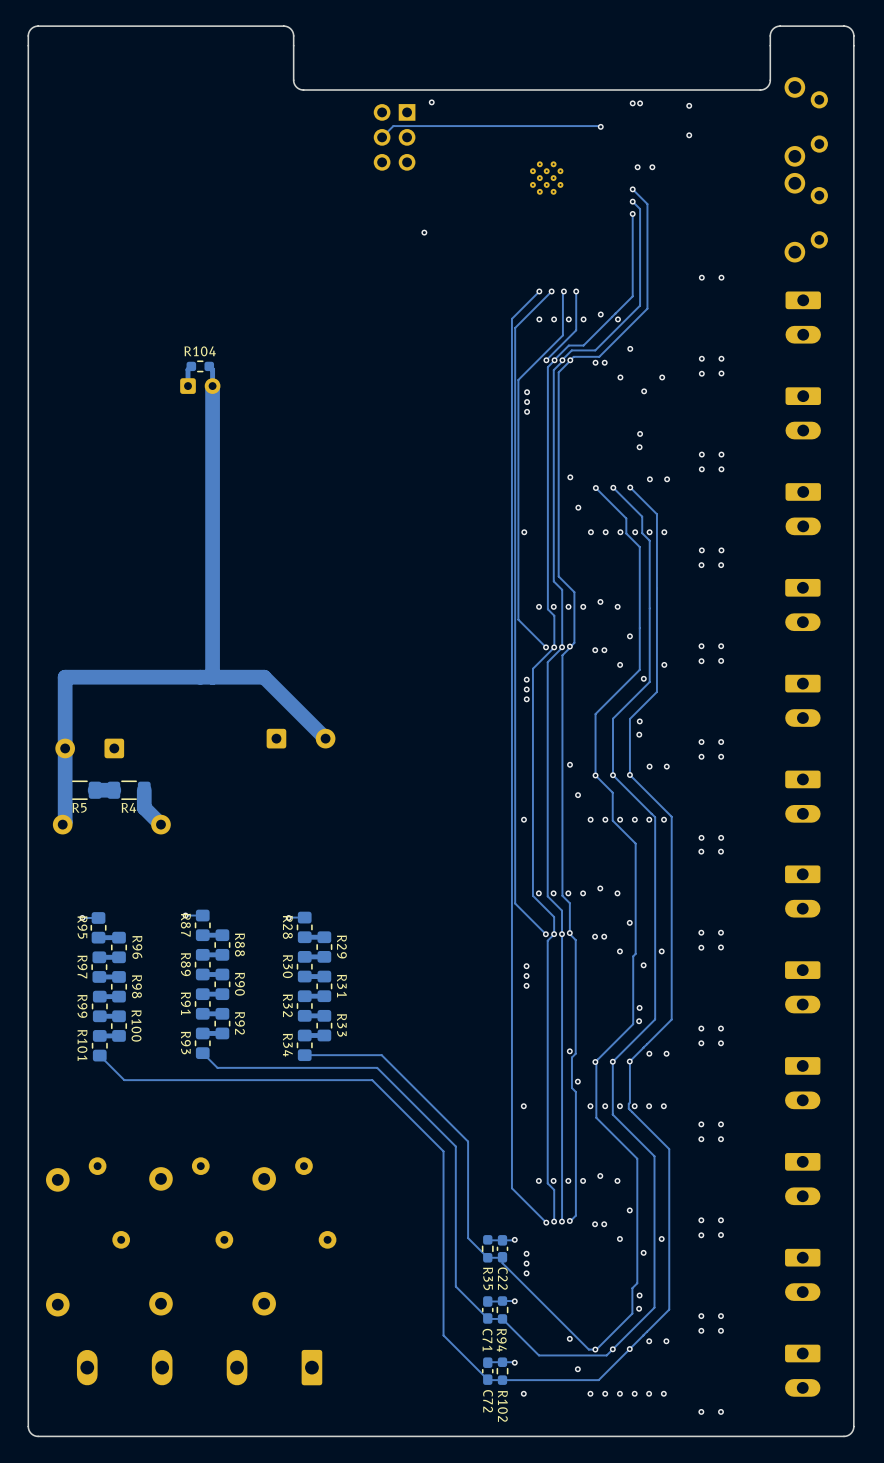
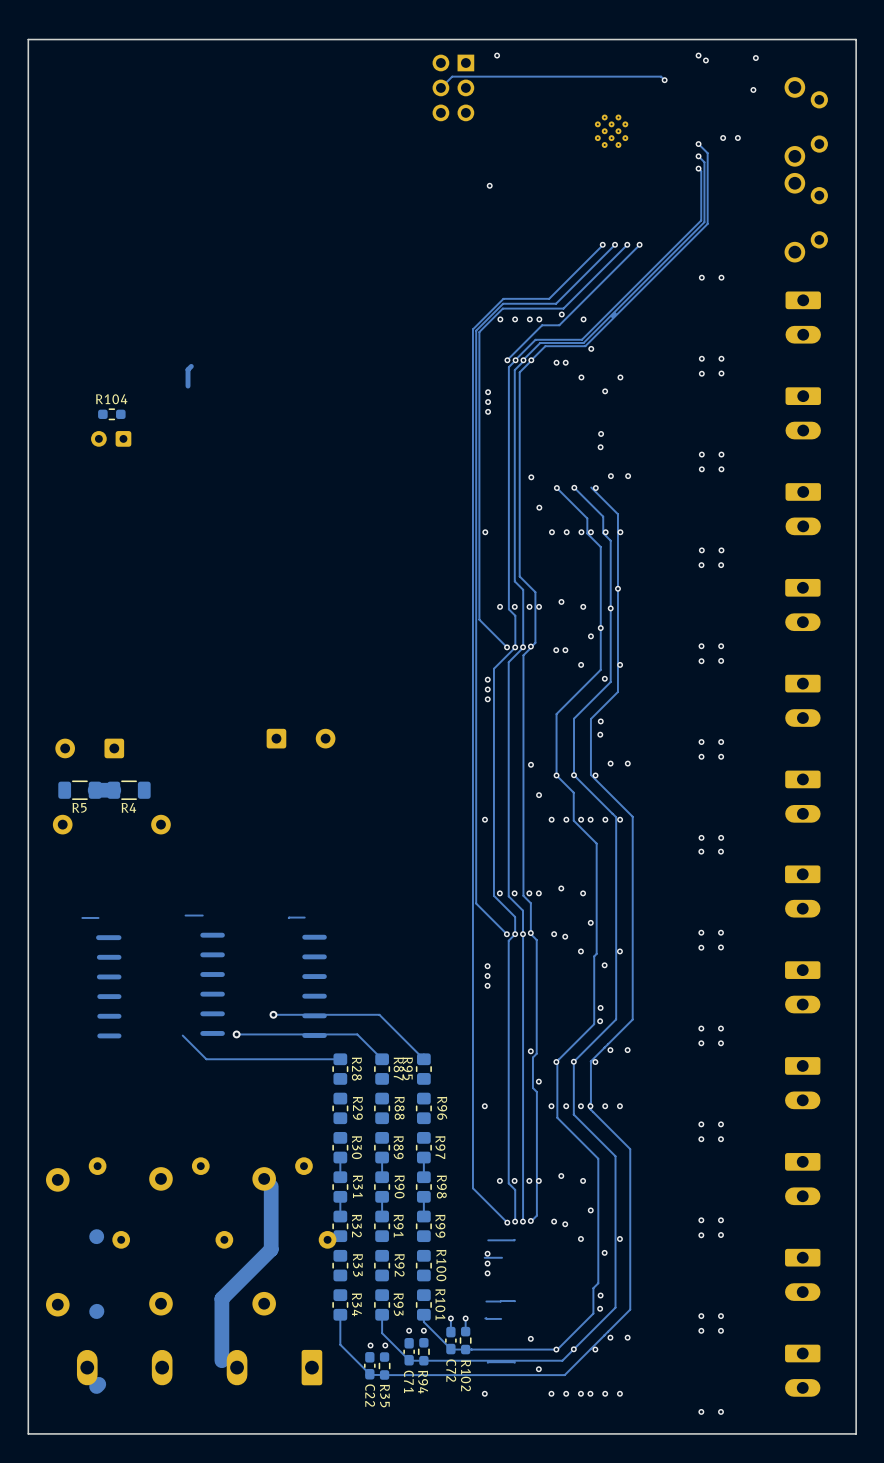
board edge: (28, 39) (30, 29) (38, 26) (286, 26) (291, 29) (293, 34) (293, 82) (296, 87) (302, 89) (760, 90) (766, 87) (770, 82) (770, 34) (774, 27) (845, 26) (850, 29) (853, 35) (853, 1426) (852, 1431) (844, 1436) (38, 1436) (31, 1433) (28, 1426) -> (28, 39) (856, 39) (856, 1433) (28, 1433) (28, 1426)
via: none -> (497, 55)
via: none -> (698, 55)
via: none -> (755, 58)
via: none -> (705, 60)
track: none -> (664, 80) (661, 76) (452, 76) (440, 87)
via: none -> (664, 80)
via: none -> (753, 89)
via: (431, 102) -> none
via: (632, 103) -> none
via: (640, 103) -> none
via: (689, 105) -> none
track: (600, 126) (393, 126) (382, 137) -> none
via: (600, 126) -> none
via: (689, 135) -> none
part position: (394, 137) -> (453, 87)
via: none -> (723, 138)
via: none -> (737, 138)
track: none -> (698, 144) (707, 153) (707, 223) (585, 346) (545, 346) (519, 372) (519, 576) (535, 592) (535, 642) (523, 655) (523, 895) (530, 903) (530, 934) (536, 940) (536, 1053) (532, 1057) (532, 1088) (536, 1091) (536, 1215) (530, 1221)
via: none -> (698, 144)
track: none -> (698, 156) (704, 162) (704, 222) (583, 342) (540, 342) (514, 370) (514, 581) (523, 589) (523, 647) (508, 662) (508, 896) (523, 910) (523, 1221)
via: none -> (698, 156)
via: (637, 167) -> none
via: (652, 167) -> none
track: none -> (698, 168) (701, 171) (701, 220) (581, 339) (535, 339) (515, 359)
via: none -> (698, 168)
part position: (546, 178) -> (611, 131)
via: none -> (489, 185)
track: (632, 189) (647, 204) (647, 308) (599, 356) (573, 356) (558, 372) (558, 576) (574, 592) (574, 642) (562, 655) (562, 895) (569, 903) (569, 934) (575, 940) (575, 1053) (571, 1057) (571, 1088) (575, 1091) (575, 1215) (569, 1221) -> none
via: (632, 189) -> none
track: (632, 201) (640, 209) (640, 305) (595, 350) (571, 350) (553, 370) (553, 581) (562, 589) (562, 647) (547, 662) (547, 896) (562, 910) (562, 1221) -> none
via: (632, 201) -> none
track: (632, 213) (632, 296) (615, 313) -> none
via: (632, 213) -> none
via: (424, 232) -> none
track: none -> (602, 244) (549, 298) (503, 298) (472, 329) (472, 1188) (507, 1222)
via: none -> (602, 244)
track: none -> (615, 244) (556, 303) (503, 303) (476, 330) (476, 903) (506, 934)
via: none -> (615, 244)
track: none -> (627, 244) (563, 308) (502, 308) (479, 332) (479, 619) (507, 647)
via: none -> (627, 244)
track: none -> (639, 244) (559, 325) (542, 325) (507, 360)
via: none -> (639, 244)
track: (539, 291) (511, 318) (511, 1188) (546, 1222) -> none
via: (539, 291) -> none
track: (551, 291) (515, 327) (515, 903) (545, 934) -> none
via: (551, 291) -> none
track: (563, 291) (562, 335) (518, 379) (518, 619) (546, 647) -> none
via: (563, 291) -> none
track: (576, 291) (576, 330) (546, 360) -> none
via: (576, 291) -> none
via: none -> (561, 314)
via: (600, 314) -> none
track: (612, 317) (583, 345) (568, 345) (554, 359) -> none
via: none -> (500, 319)
via: none -> (515, 319)
via: none -> (529, 319)
via: (554, 319) -> none
via: (568, 319) -> none
via: (617, 319) -> none
via: none -> (591, 348)
via: (630, 348) -> none
track: (554, 359) (547, 367) (547, 609) (554, 615) (554, 647) (532, 668) (532, 895) (554, 917) (554, 934) (547, 940) (547, 1183) (554, 1189) (554, 1221) -> (515, 359) (508, 367) (508, 609) (515, 615) (515, 647) (493, 668) (493, 895) (515, 917) (515, 934) (508, 940) (508, 1183) (515, 1189) (515, 1221)
via: none -> (507, 360)
via: none -> (515, 360)
via: none -> (523, 360)
via: none -> (531, 360)
via: (546, 360) -> none
via: (554, 360) -> none
via: (562, 360) -> none
via: (570, 360) -> none
via: none -> (556, 362)
via: none -> (565, 362)
via: (595, 362) -> none
via: (604, 362) -> none
R104 position: (200, 366) -> (111, 414)
track: (209, 366) (212, 369) (212, 677) -> none
via: none -> (581, 377)
via: (662, 377) -> none
part rotation: 0° (200, 386) -> 180° (111, 438)
part position: (200, 386) -> (111, 438)
via: none -> (605, 391)
via: (644, 391) -> none
via: none -> (488, 392)
via: (527, 392) -> none
via: none -> (488, 402)
via: (527, 402) -> none
via: none -> (488, 411)
via: (527, 411) -> none
via: none -> (601, 433)
via: (640, 433) -> none
via: none -> (600, 447)
via: (639, 447) -> none
via: none -> (610, 476)
via: none -> (628, 476)
via: none -> (531, 477)
via: (570, 477) -> none
via: (649, 479) -> none
via: (667, 479) -> none
via: none -> (574, 487)
track: none -> (591, 487) (617, 514) (617, 691) (590, 718) (590, 774) (632, 816) (632, 1019) (608, 1044)
track: (613, 487) (642, 516) (642, 533) (649, 540) (649, 682) (613, 718) (613, 775) -> (574, 487) (603, 516) (603, 533) (610, 540) (610, 682) (574, 718) (574, 775)
via: (613, 487) -> none
track: (630, 487) (656, 514) (656, 691) (629, 718) (629, 774) (671, 816) (671, 1019) (629, 1061) (628, 1108) (669, 1149) (669, 1309) (598, 1380) (488, 1380) (443, 1335) (443, 1151) (372, 1080) (124, 1080) (99, 1055) -> none
via: (630, 487) -> none
track: none -> (556, 488) (587, 518) (587, 533) (600, 546) (600, 669) (556, 714) (556, 775) (573, 792) (573, 820) (596, 843) (594, 1024) (556, 1062) (557, 1117) (598, 1158) (598, 1283) (593, 1288) (593, 1313) (557, 1349) (451, 1349) (423, 1322) (423, 1314)
via: none -> (556, 488)
track: (595, 488) (626, 518) (626, 533) (639, 546) (639, 669) (595, 714) (595, 775) (612, 792) (612, 820) (635, 843) (633, 1024) (595, 1062) (596, 1117) (637, 1158) (637, 1283) (632, 1288) (632, 1313) (596, 1349) (588, 1349) (502, 1263) (502, 1257) -> none
via: none -> (539, 507)
via: (578, 507) -> none
via: none -> (485, 532)
via: (524, 532) -> none
via: none -> (551, 532)
via: none -> (566, 532)
via: none -> (581, 532)
via: (635, 532) -> none
via: (649, 532) -> none
via: (664, 532) -> none
via: none -> (617, 588)
via: none -> (561, 601)
via: (600, 601) -> none
via: none -> (500, 606)
via: none -> (514, 606)
via: none -> (529, 606)
via: (553, 606) -> none
via: (568, 606) -> none
via: (617, 606) -> none
via: none -> (610, 608)
via: none -> (600, 628)
via: none -> (590, 636)
via: (629, 636) -> none
via: none -> (530, 646)
via: (569, 646) -> none
via: none -> (507, 647)
via: none -> (515, 647)
via: none -> (523, 647)
via: (546, 647) -> none
via: (554, 647) -> none
via: (562, 647) -> none
via: none -> (556, 650)
via: none -> (565, 650)
via: (595, 650) -> none
via: (604, 650) -> none
via: none -> (581, 664)
via: (664, 664) -> none
via: none -> (604, 678)
via: (643, 678) -> none
via: none -> (487, 679)
via: (526, 679) -> none
via: none -> (487, 689)
via: (526, 689) -> none
via: none -> (487, 699)
via: (526, 699) -> none
via: none -> (600, 721)
via: (639, 721) -> none
via: none -> (600, 734)
via: (639, 734) -> none
track: (325, 738) (264, 677) (65, 677) (65, 822) (62, 824) -> none
via: none -> (610, 763)
via: none -> (627, 763)
via: none -> (531, 764)
via: (569, 764) -> none
via: (649, 766) -> none
via: (666, 766) -> none
track: (612, 774) (651, 813) -> (573, 774) (612, 813)
via: (629, 774) -> none
via: none -> (556, 775)
via: none -> (574, 775)
via: (613, 775) -> none
track: (144, 790) (144, 807) (160, 824) -> none
via: none -> (539, 795)
via: (578, 795) -> none
track: (651, 813) (655, 817) (655, 1019) (611, 1062) -> (612, 813) (616, 817) (616, 1019) (572, 1062)
via: none -> (484, 819)
via: (523, 819) -> none
via: none -> (551, 819)
via: none -> (566, 819)
via: none -> (581, 819)
via: (634, 819) -> none
via: (649, 819) -> none
via: (664, 819) -> none
via: none -> (561, 888)
via: (600, 888) -> none
via: none -> (499, 893)
via: none -> (514, 893)
via: none -> (529, 893)
via: (553, 893) -> none
via: (568, 893) -> none
via: (617, 893) -> none
via: (185, 915) -> none
via: (82, 917) -> none
via: (288, 917) -> none
via: none -> (590, 922)
via: (629, 922) -> none
R87 name position: R87 (185, 925) -> R87 (398, 1068)
R87 position: (202, 925) -> (382, 1069)
R95 position: (98, 927) -> (423, 1069)
R28 name position: R28 (287, 927) -> R28 (356, 1069)
R28 position: (304, 927) -> (340, 1069)
via: none -> (530, 933)
via: (569, 933) -> none
via: none -> (506, 934)
via: none -> (515, 934)
via: none -> (523, 934)
via: (545, 934) -> none
via: (562, 934) -> none
via: none -> (565, 936)
via: (595, 936) -> none
via: (604, 936) -> none
R88 position: (222, 945) -> (382, 1108)
R96 position: (119, 947) -> (423, 1108)
R29 position: (324, 947) -> (340, 1108)
via: none -> (580, 951)
via: (661, 951) -> none
R89 name position: R89 (185, 964) -> R89 (398, 1147)
R89 position: (202, 964) -> (382, 1147)
via: none -> (604, 965)
via: (643, 965) -> none
R97 name position: R97 (82, 966) -> R97 (440, 1147)
R30 name position: R30 (287, 966) -> R30 (356, 1147)
R30 position: (304, 966) -> (340, 1147)
via: none -> (487, 966)
via: (526, 966) -> none
R97 position: (99, 967) -> (423, 1147)
via: none -> (487, 976)
via: (526, 976) -> none
R90 position: (222, 984) -> (382, 1187)
via: none -> (487, 985)
via: (526, 985) -> none
R98 position: (119, 986) -> (423, 1187)
R31 position: (324, 986) -> (340, 1187)
R91 name position: R91 (185, 1003) -> R91 (398, 1226)
R91 position: (202, 1003) -> (382, 1226)
R32 name position: R32 (287, 1005) -> R32 (356, 1226)
R99 name position: R99 (82, 1006) -> R99 (440, 1226)
R99 position: (99, 1006) -> (423, 1226)
R32 position: (304, 1006) -> (340, 1226)
via: none -> (600, 1007)
via: (639, 1007) -> none
track: none -> (273, 1014) (379, 1014) (423, 1059) (423, 1054)
via: none -> (273, 1014)
via: none -> (600, 1021)
via: (639, 1021) -> none
R92 position: (222, 1023) -> (382, 1265)
R33 position: (324, 1025) -> (340, 1265)
R100 position: (119, 1026) -> (423, 1265)
track: none -> (236, 1034) (357, 1034) (382, 1059)
via: none -> (236, 1034)
track: none -> (182, 1035) (206, 1059) (340, 1059)
R93 name position: R93 (185, 1043) -> R93 (398, 1304)
R93 position: (202, 1043) -> (382, 1304)
track: none -> (607, 1044) (590, 1061) (589, 1108) (630, 1149) (630, 1309) (608, 1331)
R101 name position: R101 (82, 1045) -> R101 (440, 1304)
R101 position: (99, 1045) -> (423, 1304)
R34 name position: R34 (287, 1045) -> R34 (356, 1304)
R34 position: (304, 1045) -> (340, 1304)
via: none -> (610, 1050)
via: none -> (627, 1050)
via: none -> (530, 1051)
via: (569, 1051) -> none
track: (202, 1053) (217, 1067) (377, 1067) (455, 1146) (455, 1286) (487, 1318) -> none
via: (649, 1053) -> none
via: (666, 1053) -> none
track: (304, 1055) (381, 1055) (468, 1141) (468, 1238) (487, 1257) -> none
via: none -> (573, 1061)
track: (612, 1061) (612, 1114) -> (573, 1061) (573, 1114)
via: (612, 1061) -> none
via: (629, 1061) -> none
via: none -> (556, 1062)
via: none -> (538, 1081)
via: (577, 1081) -> none
via: none -> (484, 1106)
via: (523, 1106) -> none
via: none -> (551, 1106)
via: none -> (566, 1106)
via: none -> (580, 1106)
via: (634, 1106) -> none
via: (649, 1106) -> none
via: (663, 1106) -> none
track: none -> (573, 1114) (615, 1156) (615, 1307) (562, 1360) (409, 1360) (382, 1333) (382, 1314)
track: (612, 1114) (654, 1156) (654, 1307) (606, 1355) (538, 1355) (502, 1318) -> none
track: none -> (340, 1157) (340, 1177)
track: none -> (382, 1157) (382, 1177)
track: none -> (423, 1157) (423, 1177)
via: none -> (561, 1176)
via: (600, 1176) -> none
via: none -> (499, 1180)
via: none -> (514, 1180)
via: none -> (529, 1180)
via: (553, 1180) -> none
via: (568, 1180) -> none
via: (617, 1180) -> none
track: none -> (271, 1186) (271, 1249) (221, 1298) (221, 1360)
track: none -> (340, 1196) (340, 1216)
track: none -> (382, 1196) (382, 1216)
track: none -> (423, 1196) (423, 1216)
via: none -> (590, 1210)
via: (629, 1210) -> none
via: none -> (515, 1221)
via: none -> (522, 1221)
via: none -> (530, 1221)
via: (561, 1221) -> none
via: (569, 1221) -> none
via: none -> (507, 1222)
via: (546, 1222) -> none
via: none -> (565, 1224)
via: (595, 1224) -> none
via: (604, 1224) -> none
track: none -> (96, 1236) (96, 1236)
via: (514, 1239) -> none
via: none -> (580, 1239)
via: (661, 1239) -> none
R35 position: (487, 1248) -> (384, 1366)
C22 position: (502, 1248) -> (369, 1365)
via: none -> (604, 1252)
via: (643, 1252) -> none
via: none -> (487, 1253)
via: (526, 1253) -> none
via: none -> (487, 1263)
via: (526, 1263) -> none
via: none -> (487, 1273)
via: (526, 1273) -> none
via: none -> (600, 1295)
via: (639, 1295) -> none
via: (514, 1301) -> none
via: none -> (600, 1308)
via: (639, 1308) -> none
C71 position: (487, 1309) -> (409, 1351)
R94 position: (502, 1309) -> (423, 1351)
track: none -> (96, 1311) (96, 1311)
track: none -> (340, 1314) (340, 1344) (370, 1374) (384, 1374)
track: none -> (450, 1318) (450, 1332)
via: none -> (450, 1318)
track: none -> (465, 1318) (465, 1331)
via: none -> (465, 1318)
via: none -> (409, 1330)
via: none -> (423, 1330)
track: none -> (607, 1331) (564, 1375) (384, 1375)
via: none -> (610, 1337)
via: none -> (627, 1337)
via: none -> (530, 1338)
via: (569, 1338) -> none
via: (649, 1341) -> none
via: (666, 1341) -> none
via: none -> (370, 1345)
via: none -> (385, 1345)
via: none -> (556, 1349)
via: none -> (573, 1349)
via: (612, 1349) -> none
via: (629, 1349) -> none
via: (514, 1362) -> none
via: none -> (538, 1369)
via: (577, 1369) -> none
C72 position: (487, 1371) -> (450, 1340)
R102 position: (502, 1371) -> (465, 1340)
track: none -> (98, 1384) (96, 1386)
via: none -> (484, 1393)
via: (523, 1393) -> none
via: none -> (551, 1393)
via: none -> (566, 1393)
via: none -> (580, 1393)
via: (634, 1393) -> none
via: (649, 1393) -> none
via: (663, 1393) -> none

